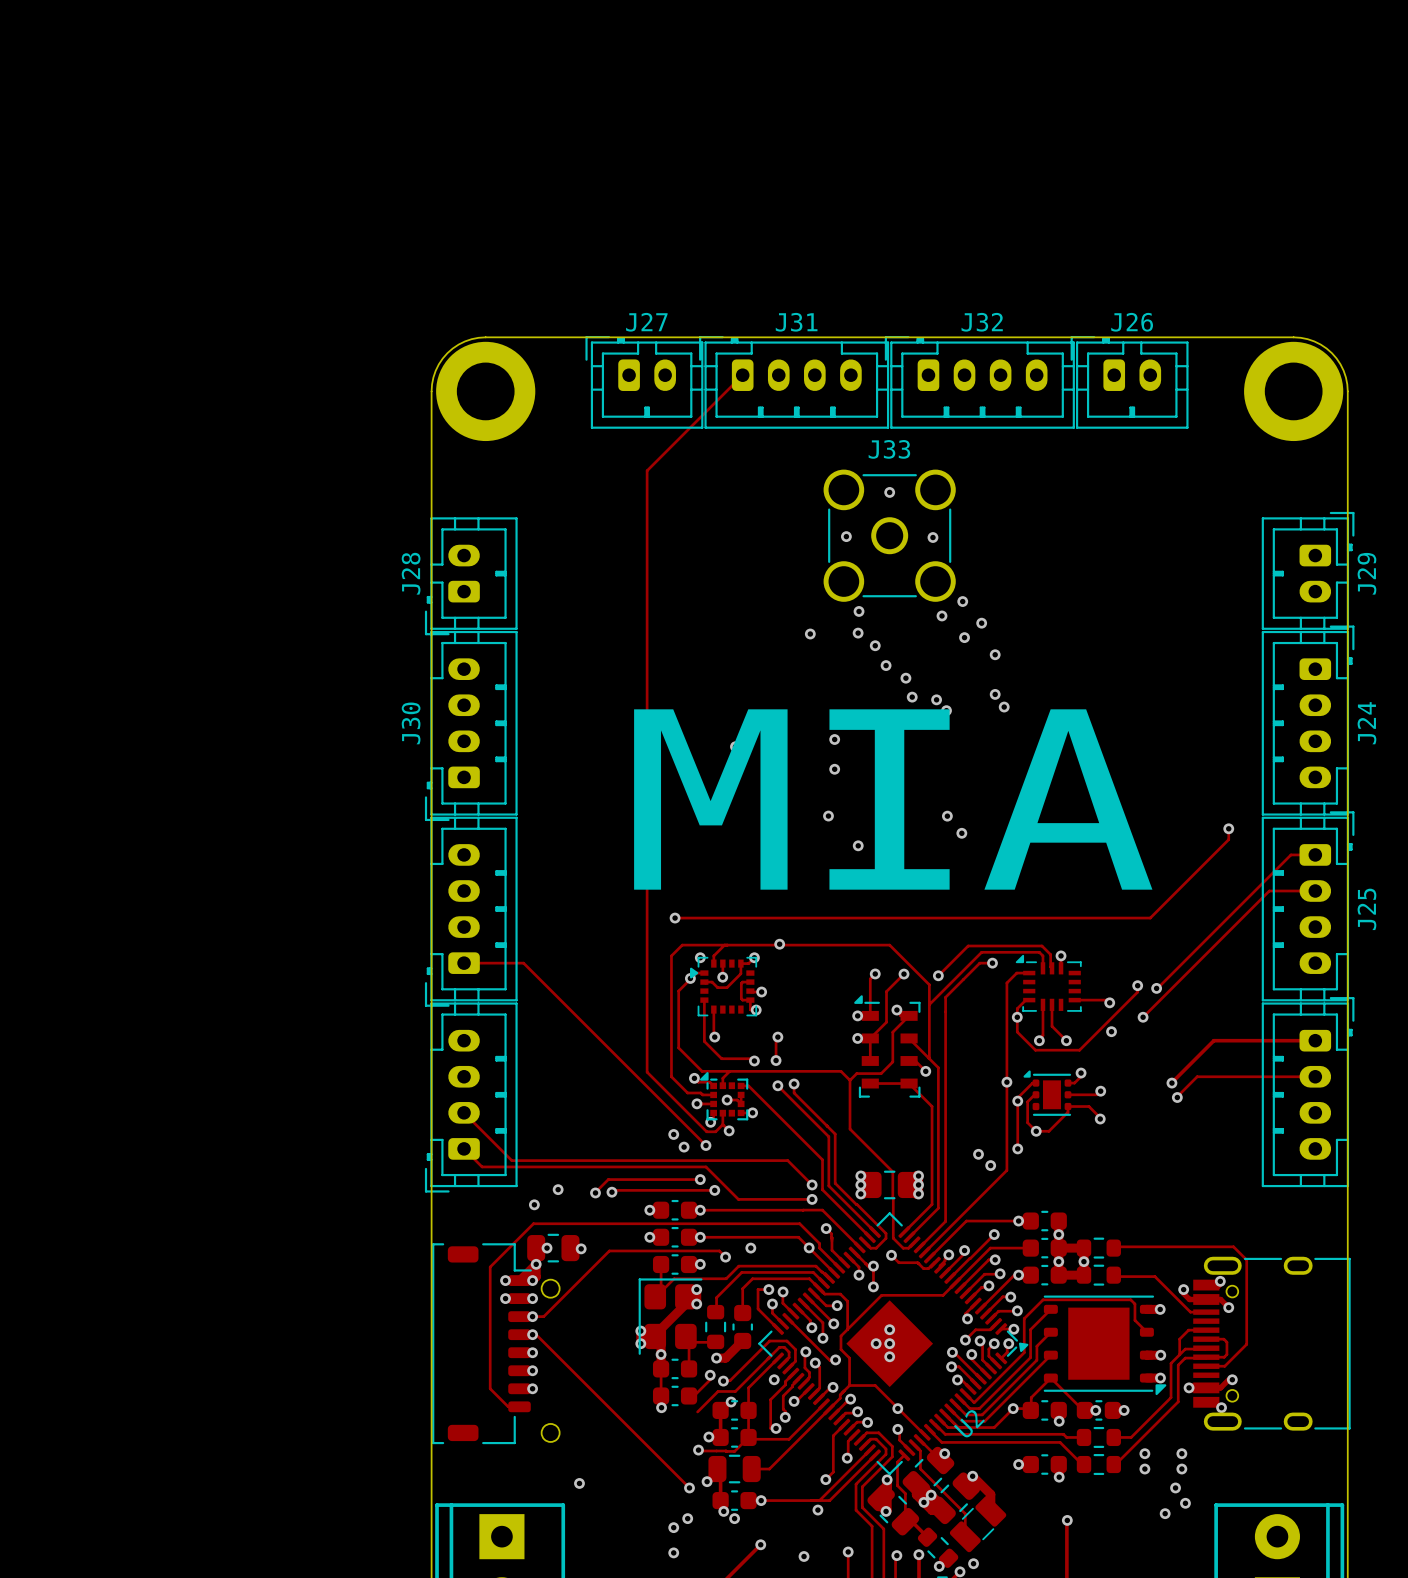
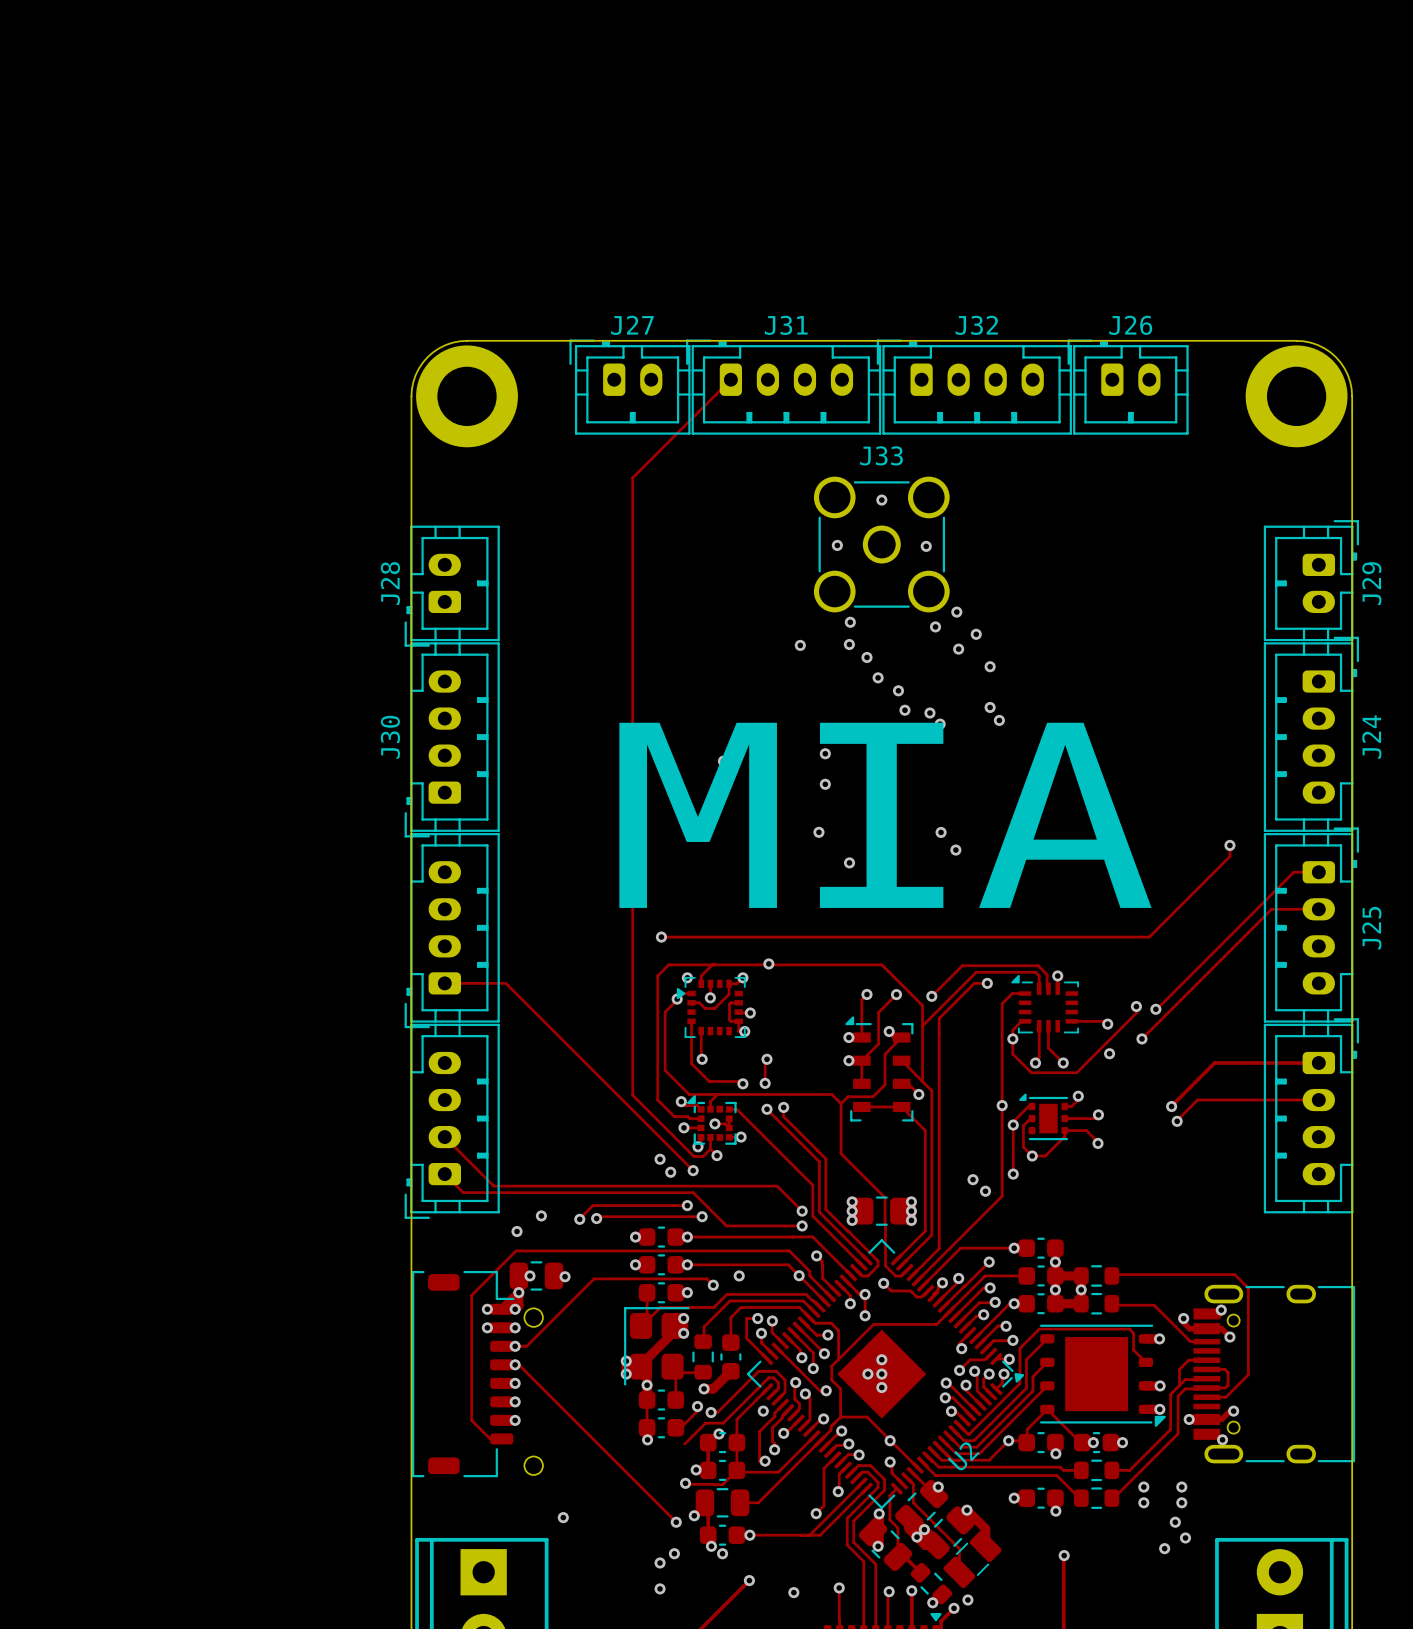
via: (817, 1510) -> none

